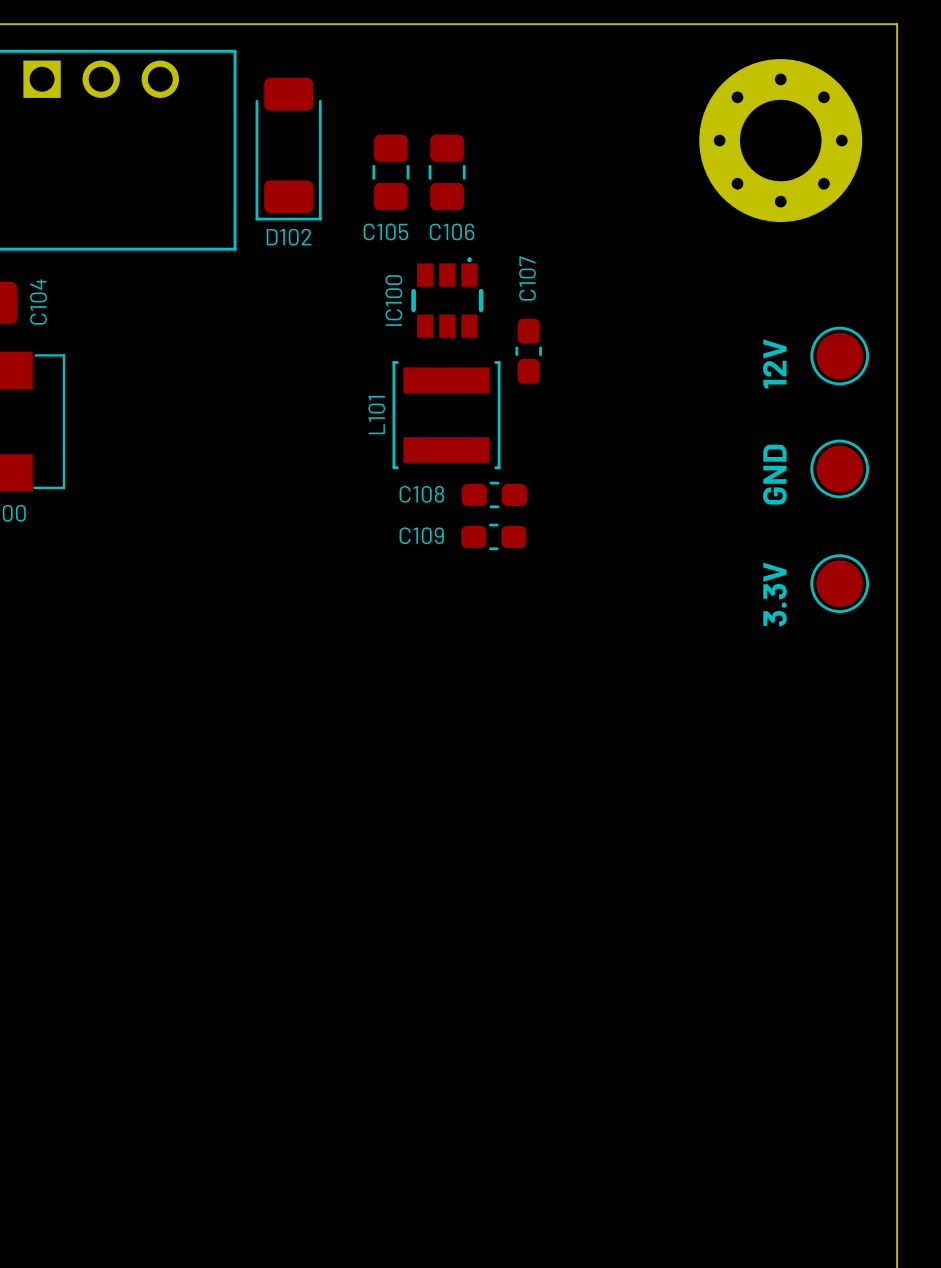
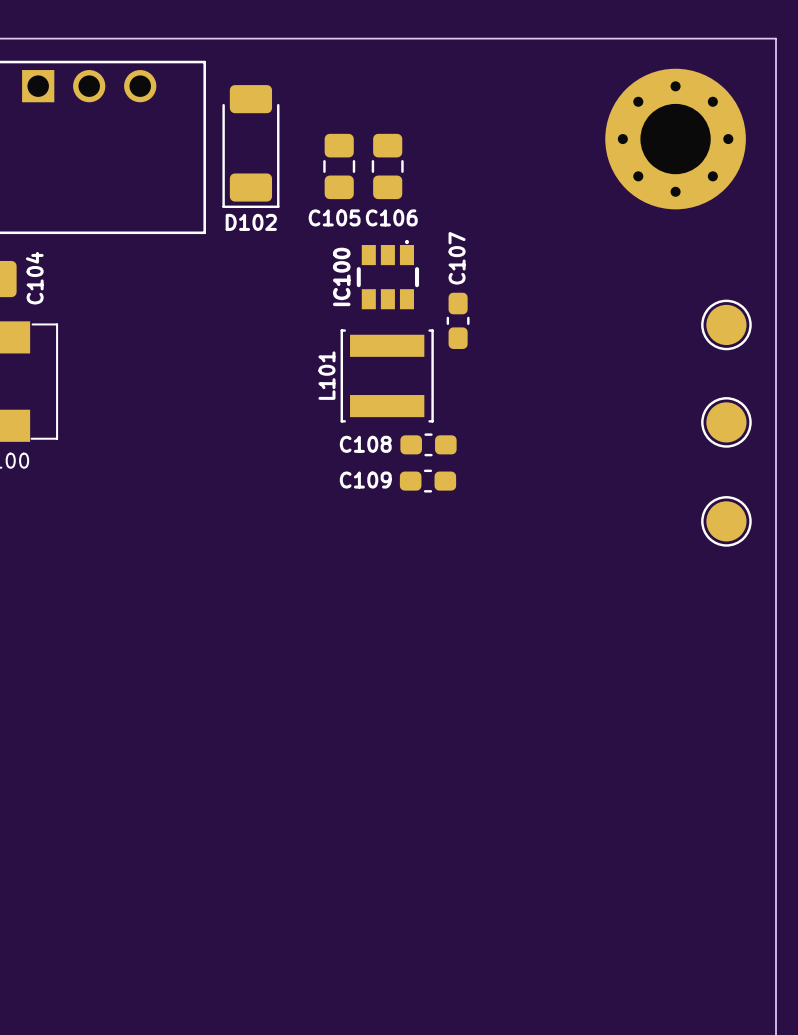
text: 12V (774, 363) -> none
text: GND (774, 474) -> none
text: 3.3V (775, 594) -> none

